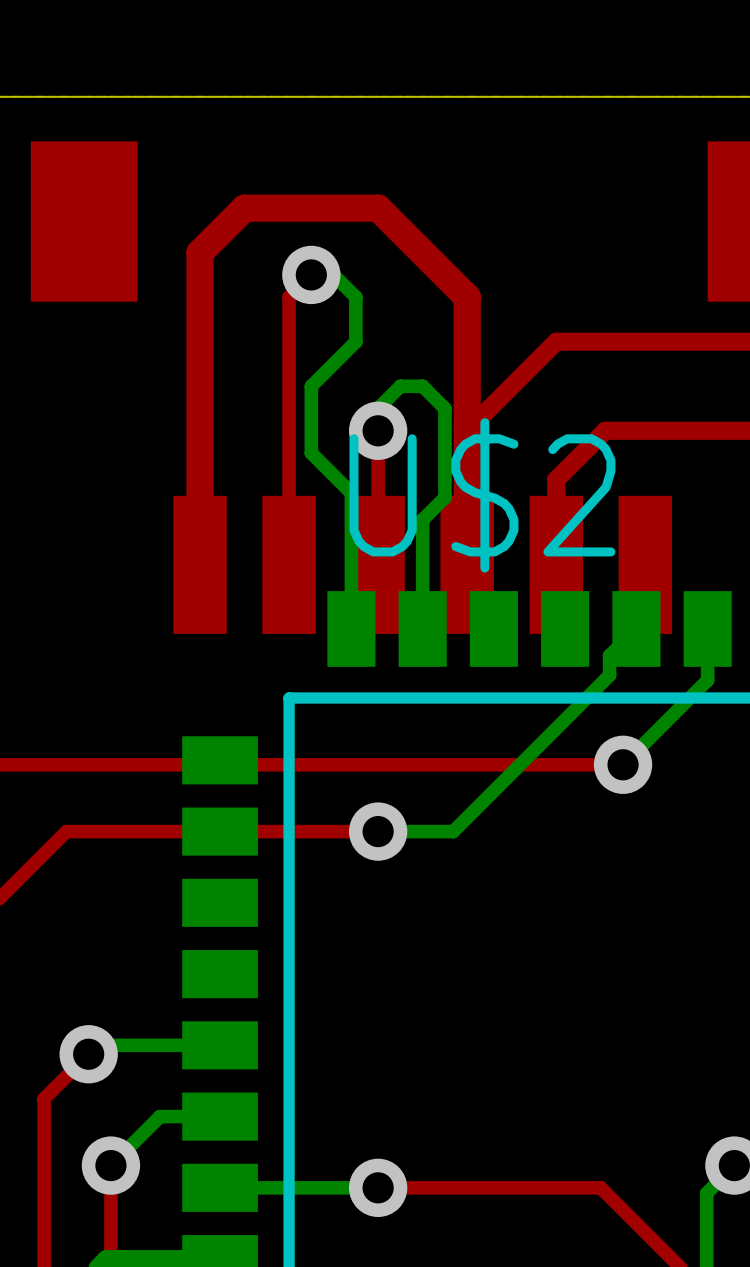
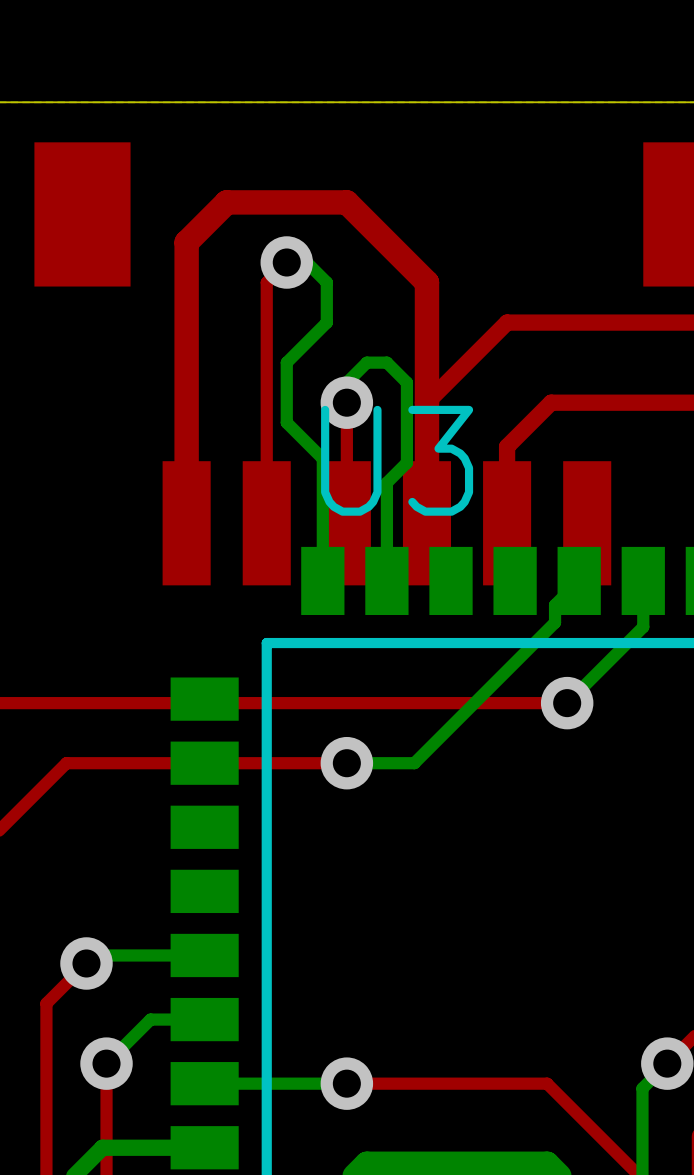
U$2 name: U$2 (482, 495) -> U3 (397, 460)

